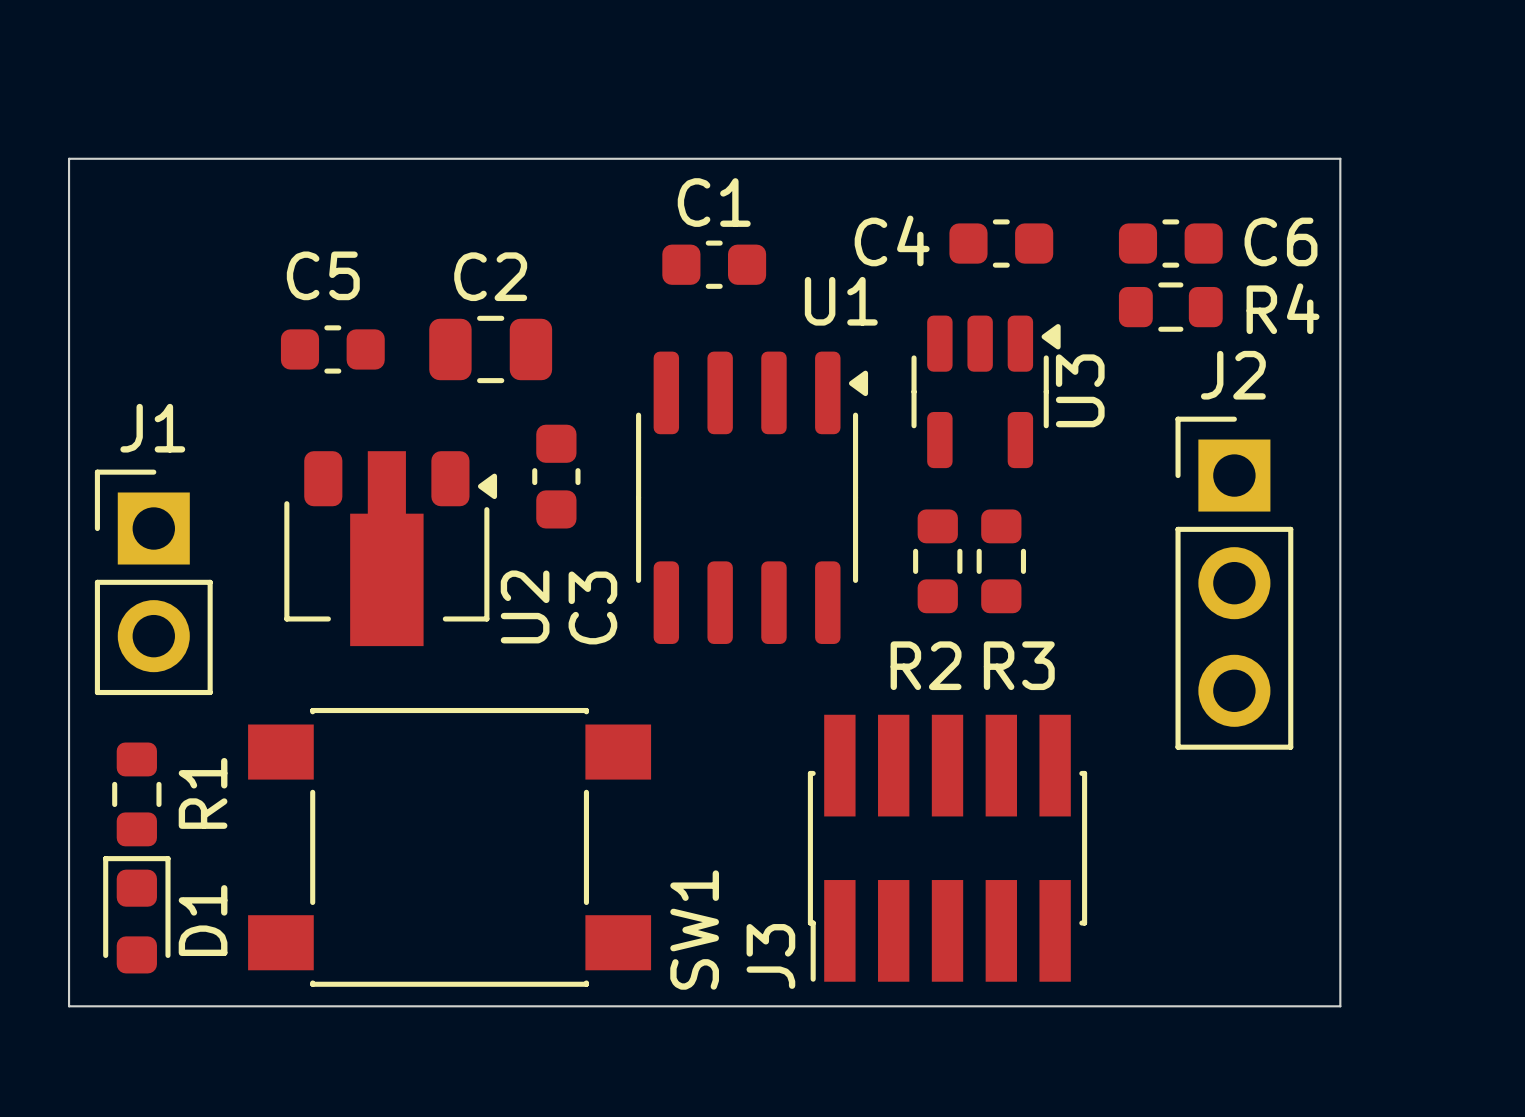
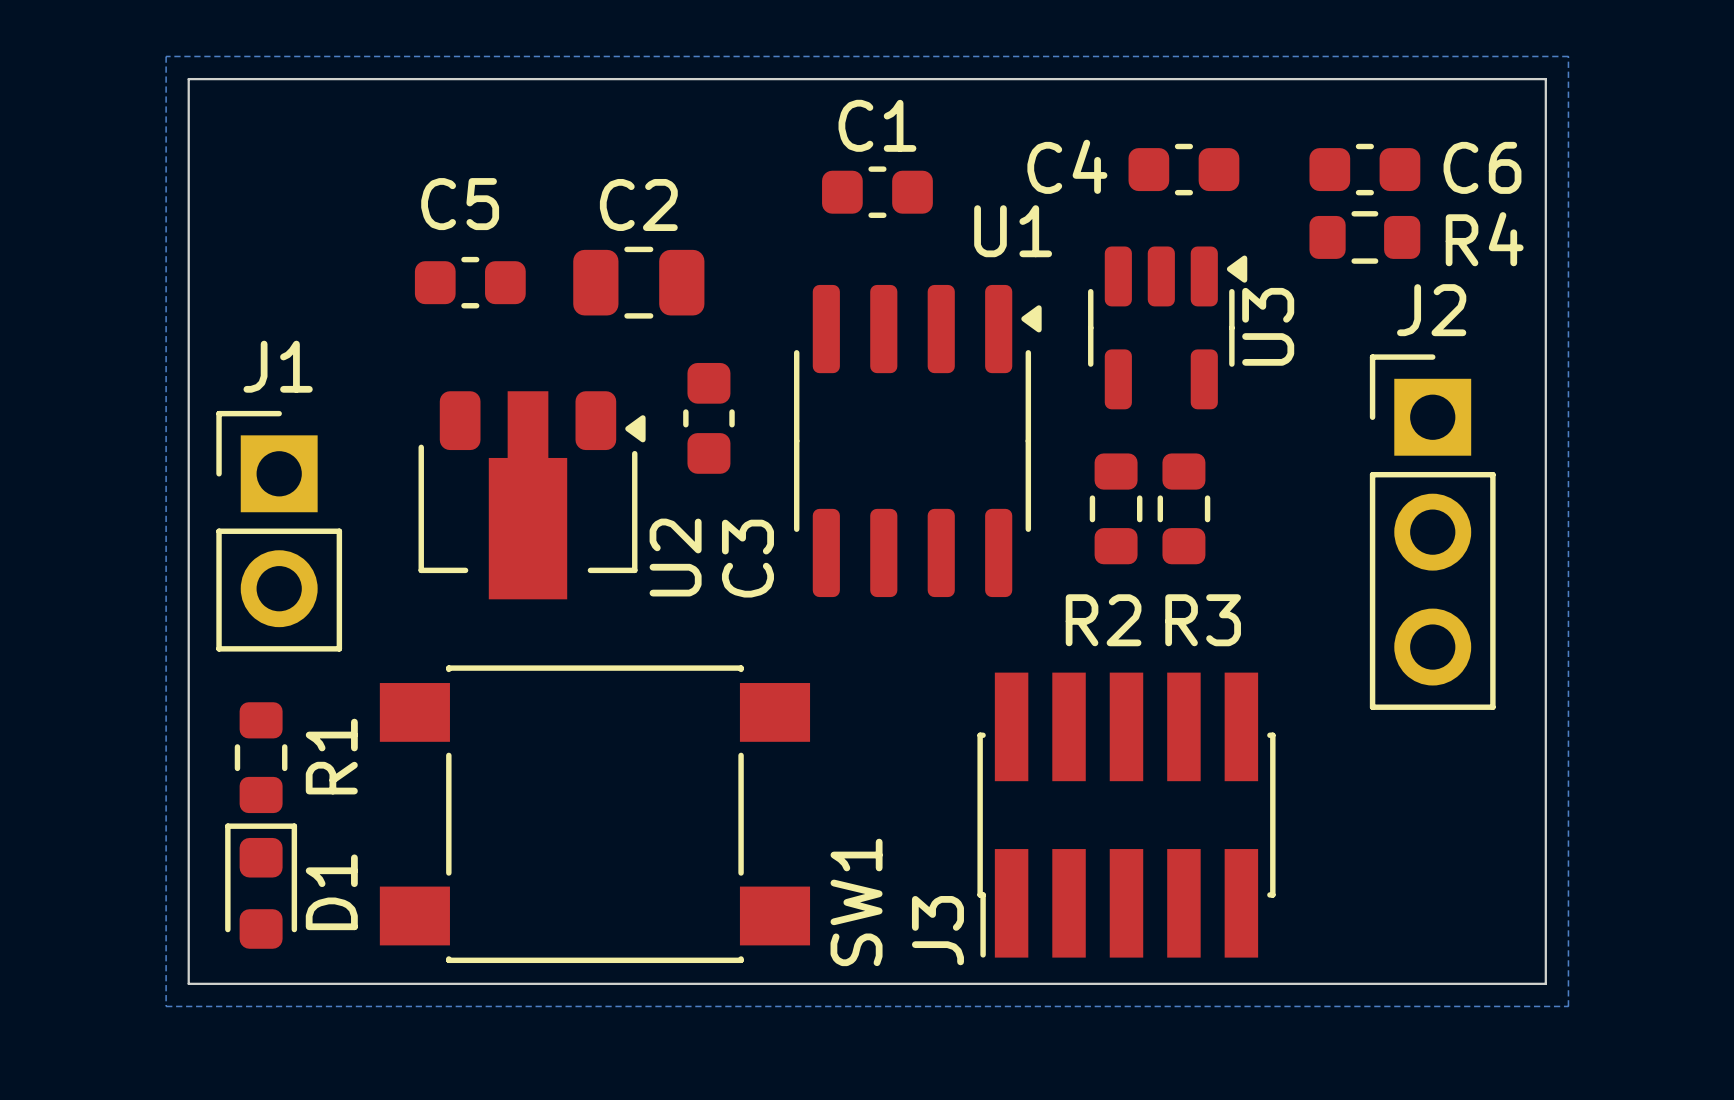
bottom zone outline: none -> (166, 56) (166, 1006) (1568, 1006) (1568, 56) (166, 56)

